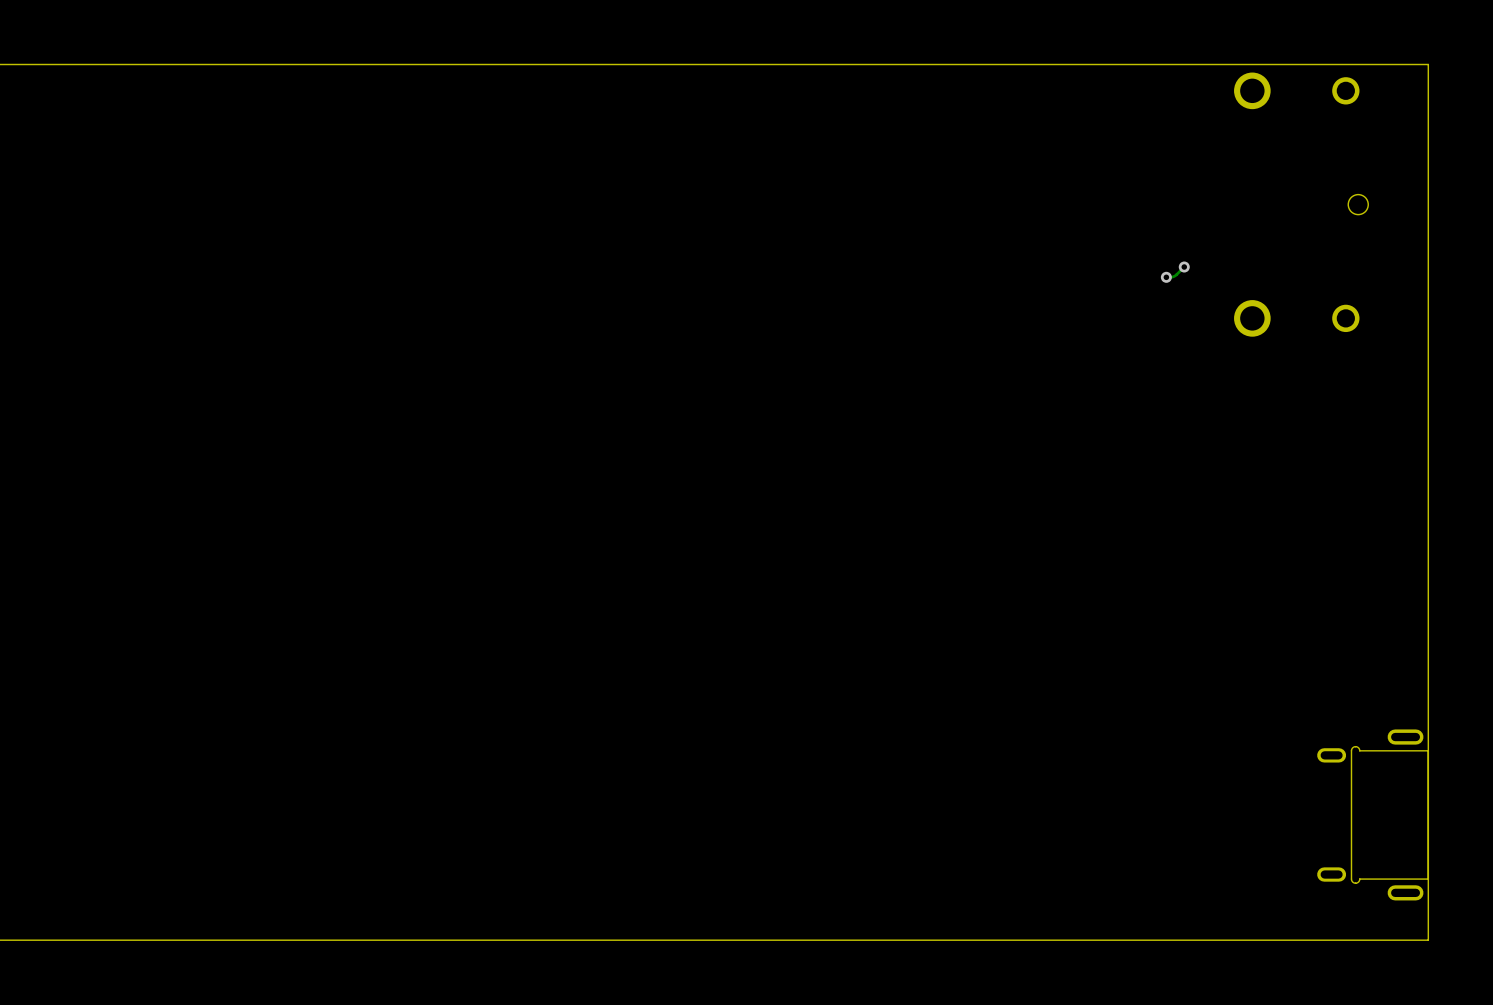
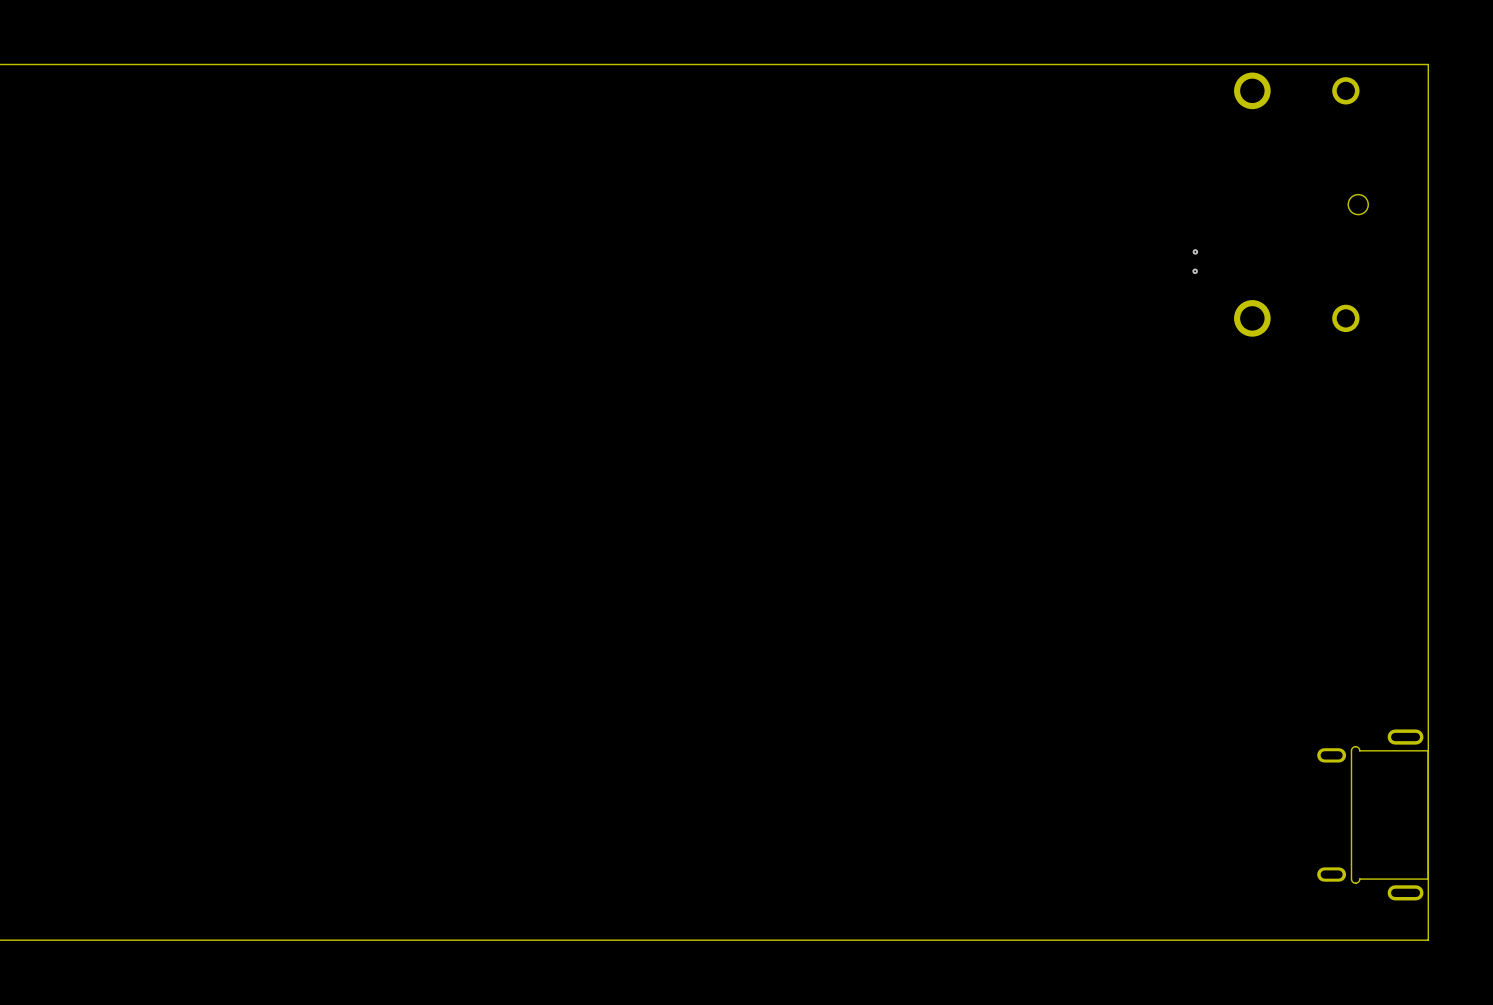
via: none -> (1195, 251)
track: (1184, 267) (1174, 276) (1166, 277) -> none
via: (1184, 267) -> none
via: none -> (1195, 271)
via: (1166, 277) -> none

